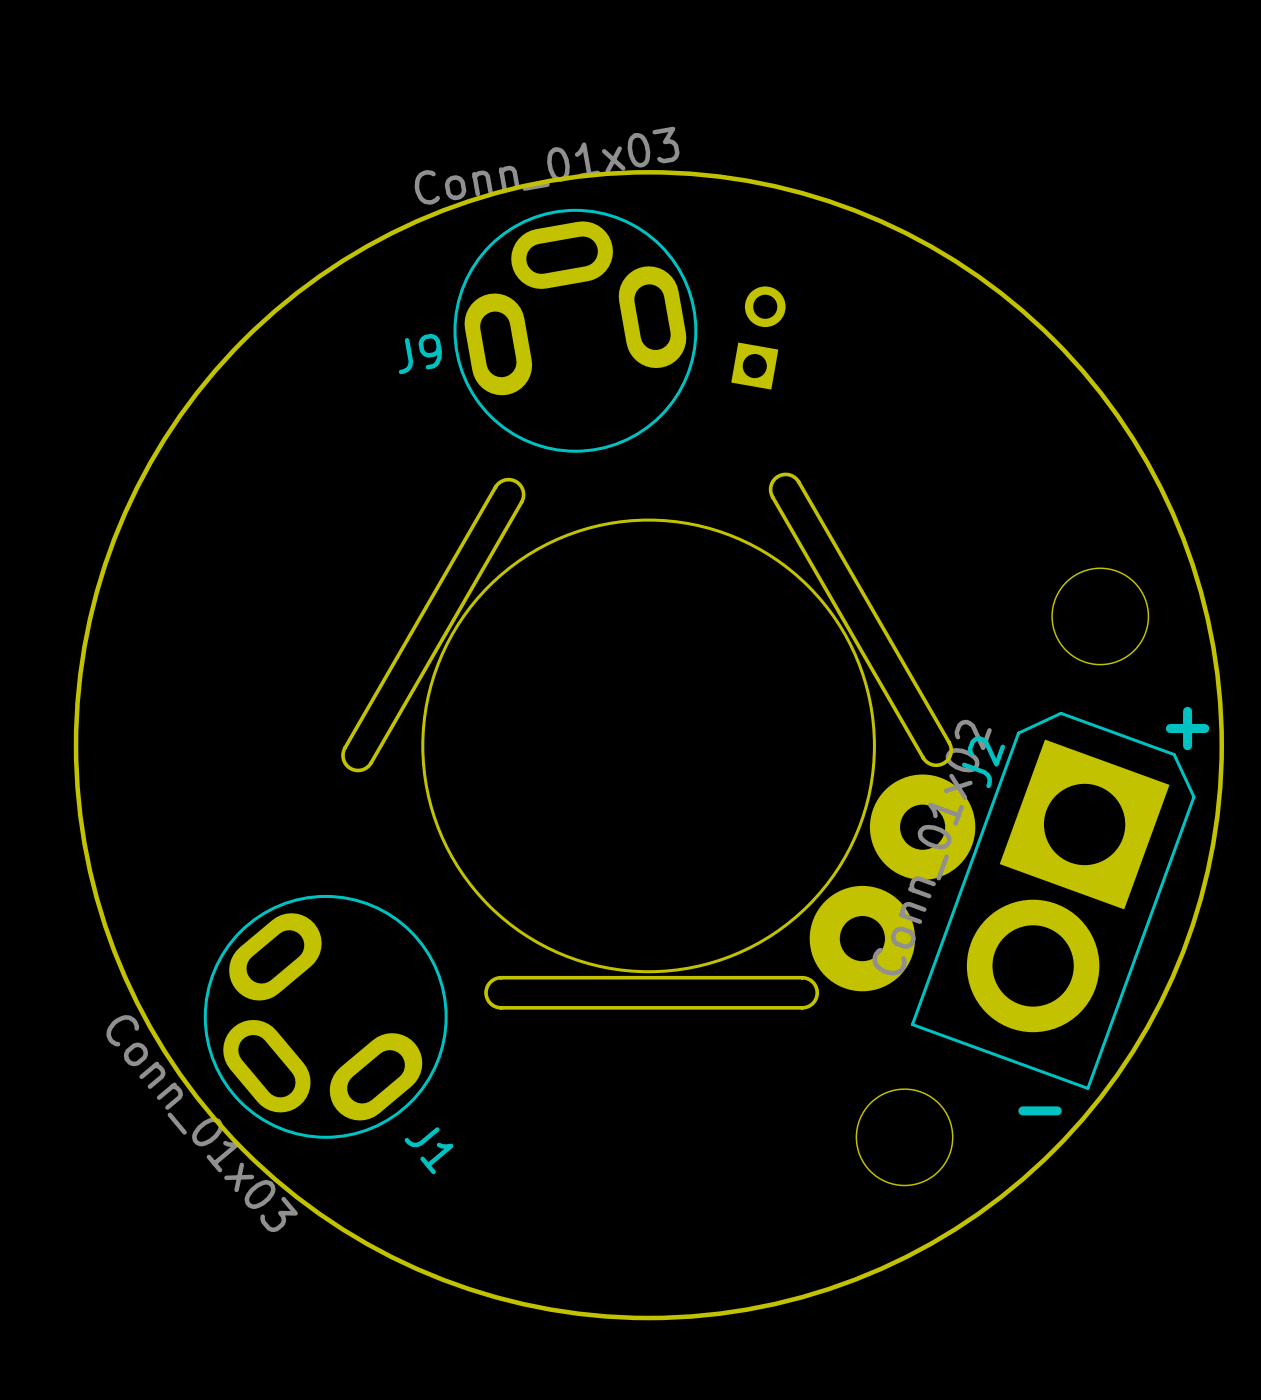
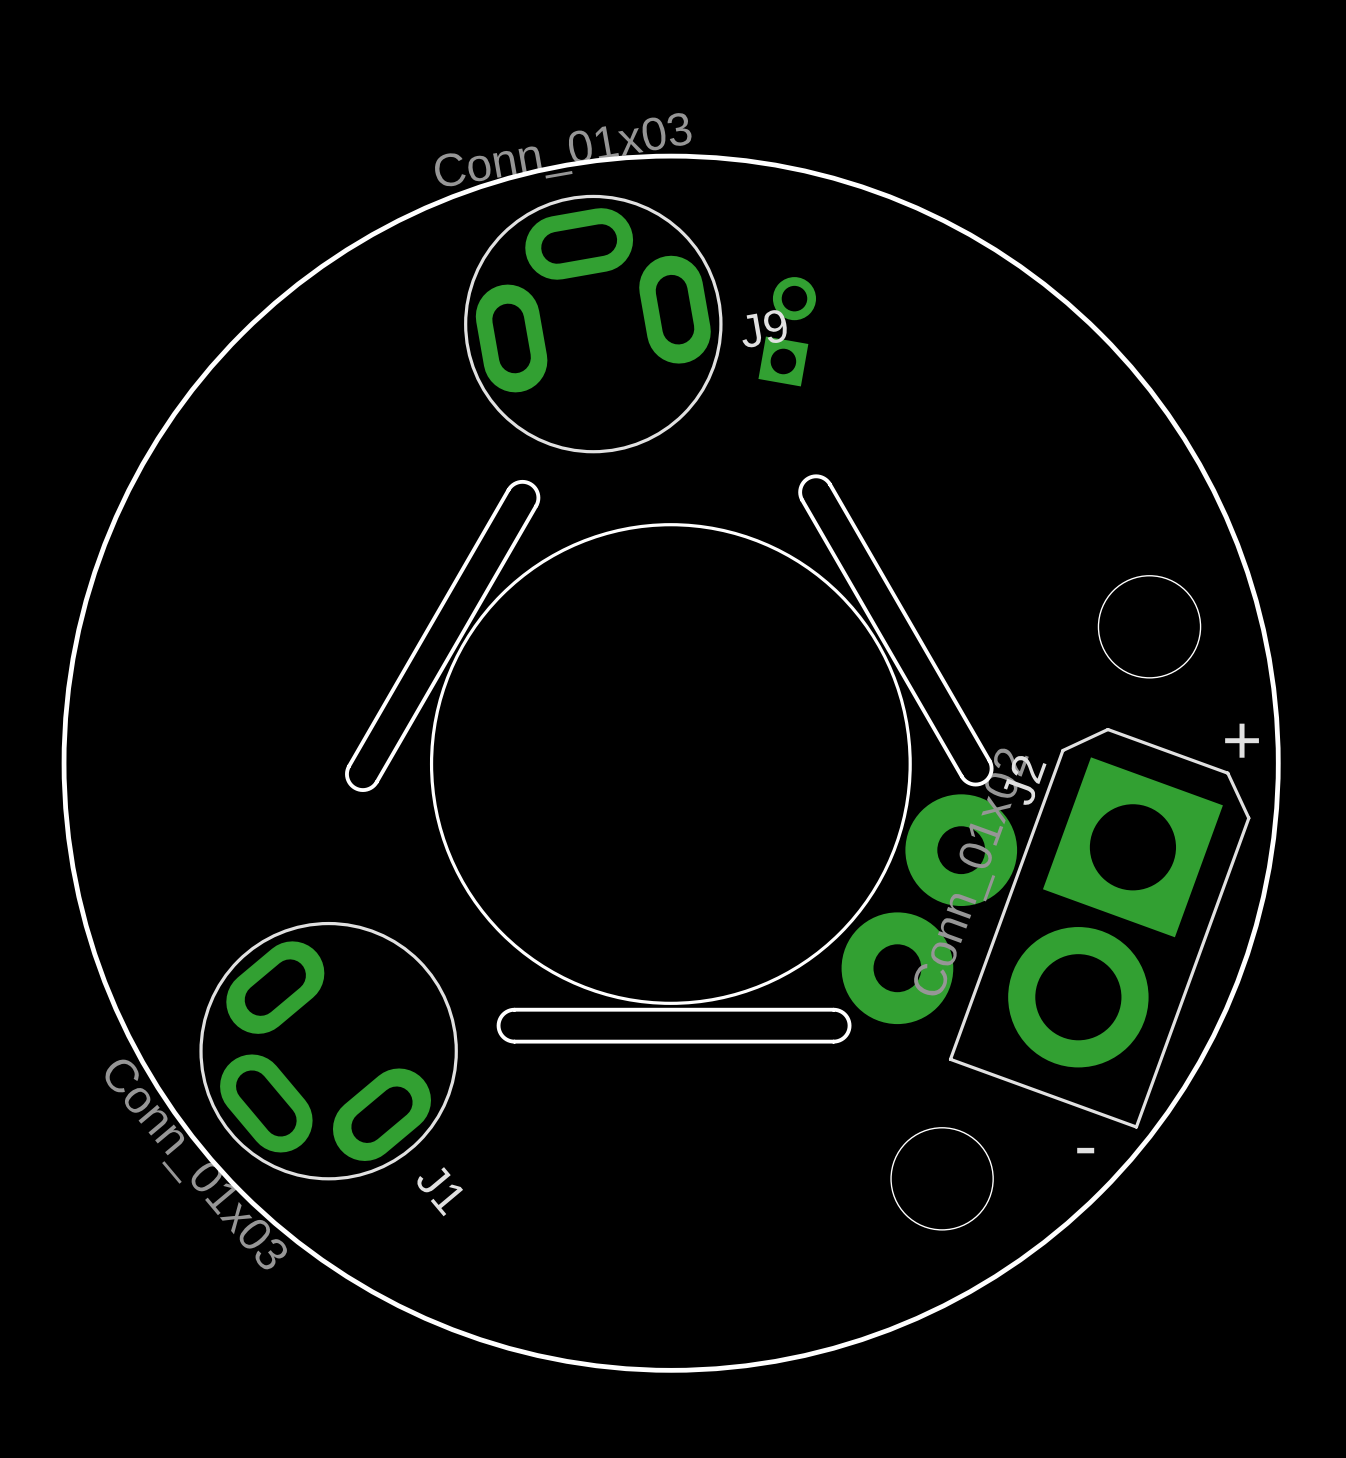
J9 name position: J9 (420, 353) -> J9 (765, 328)

